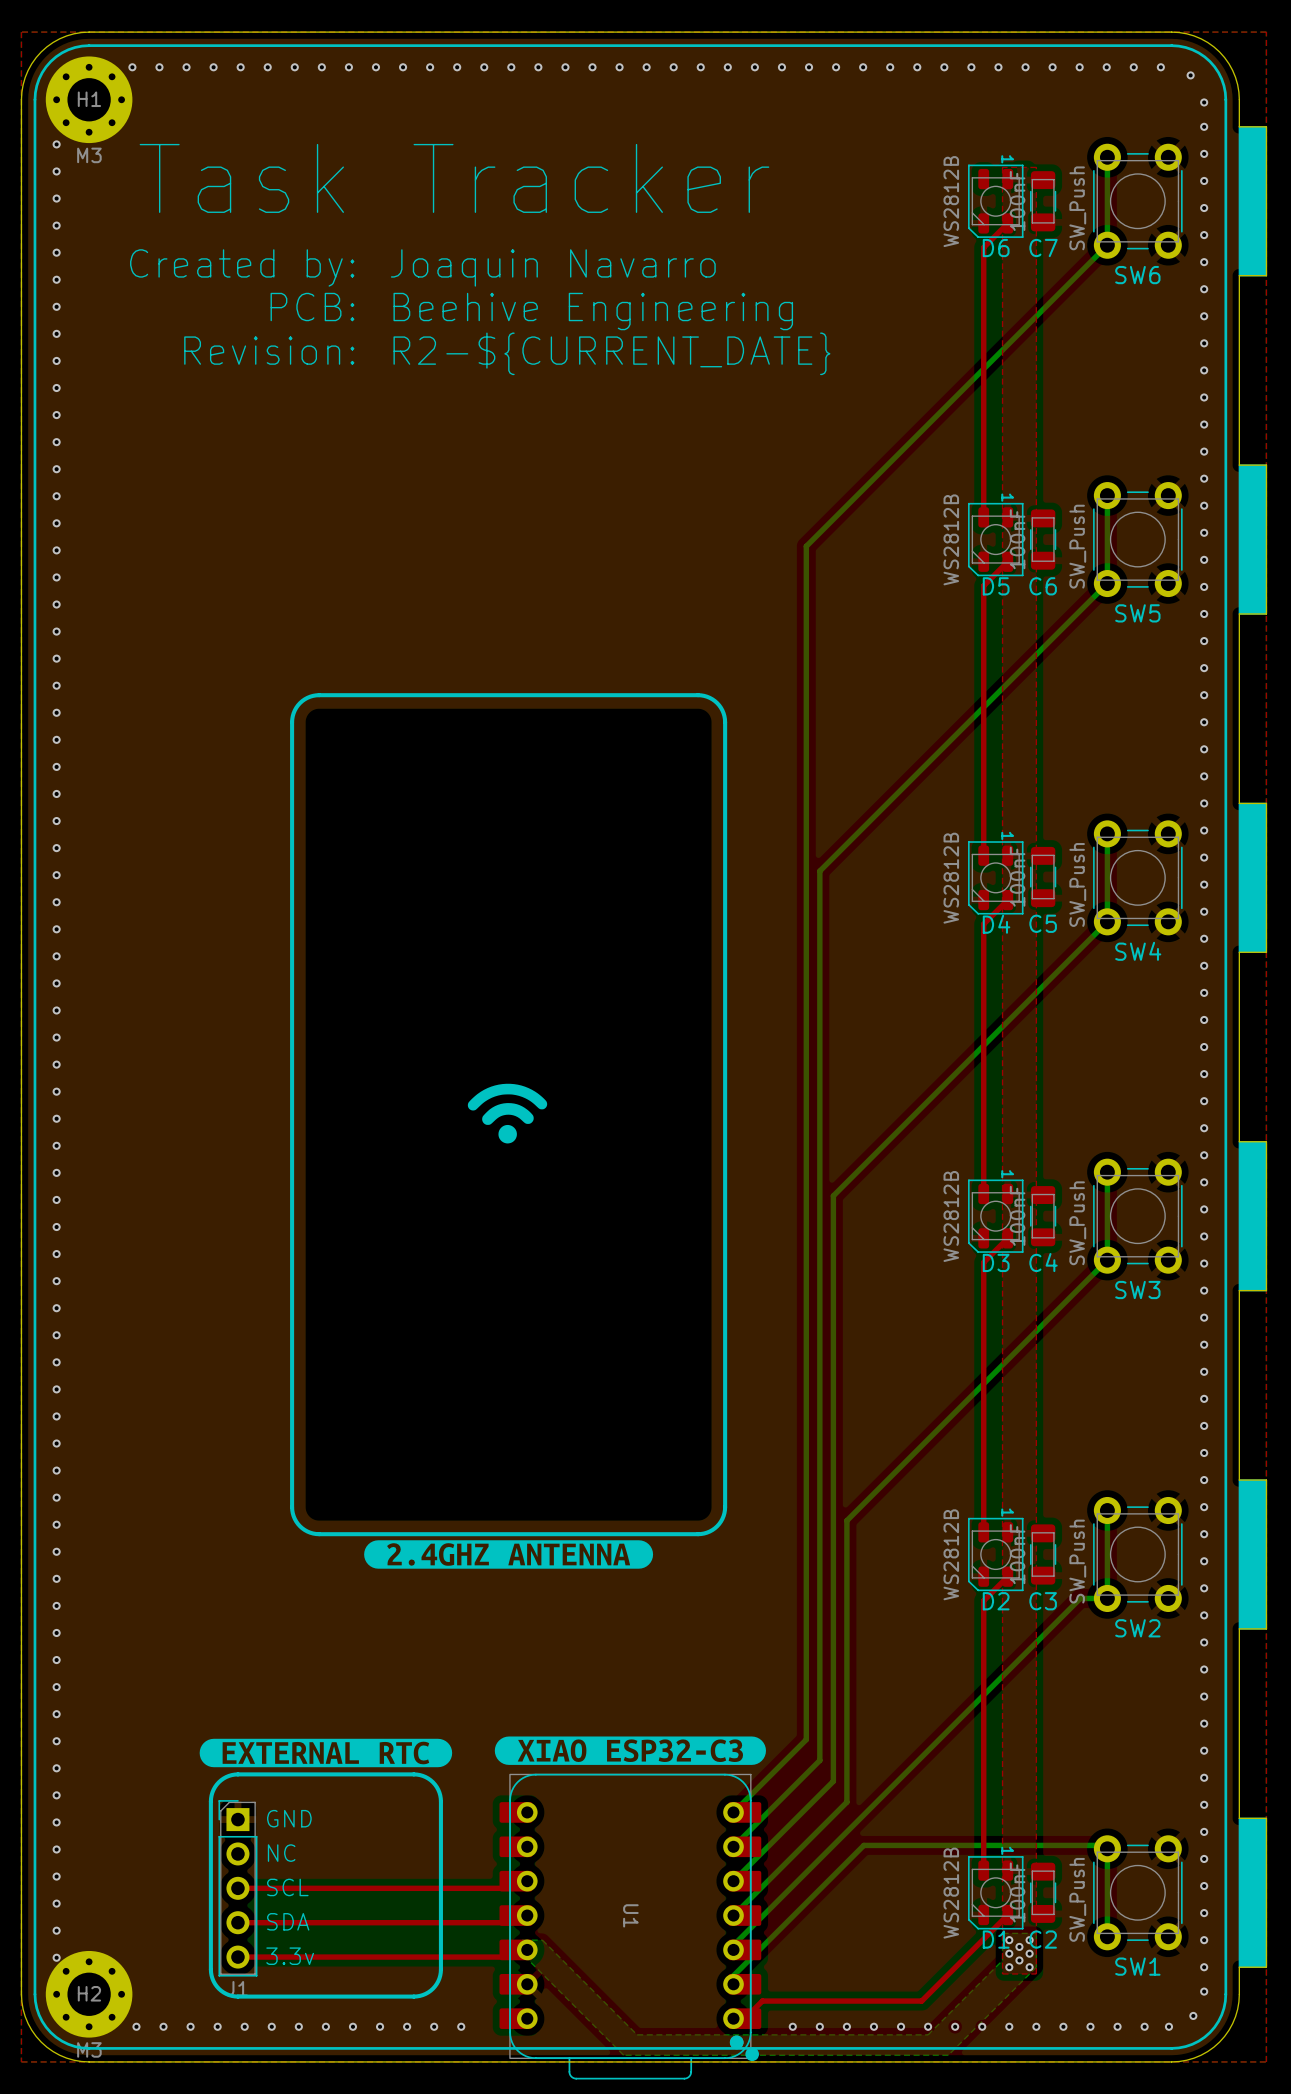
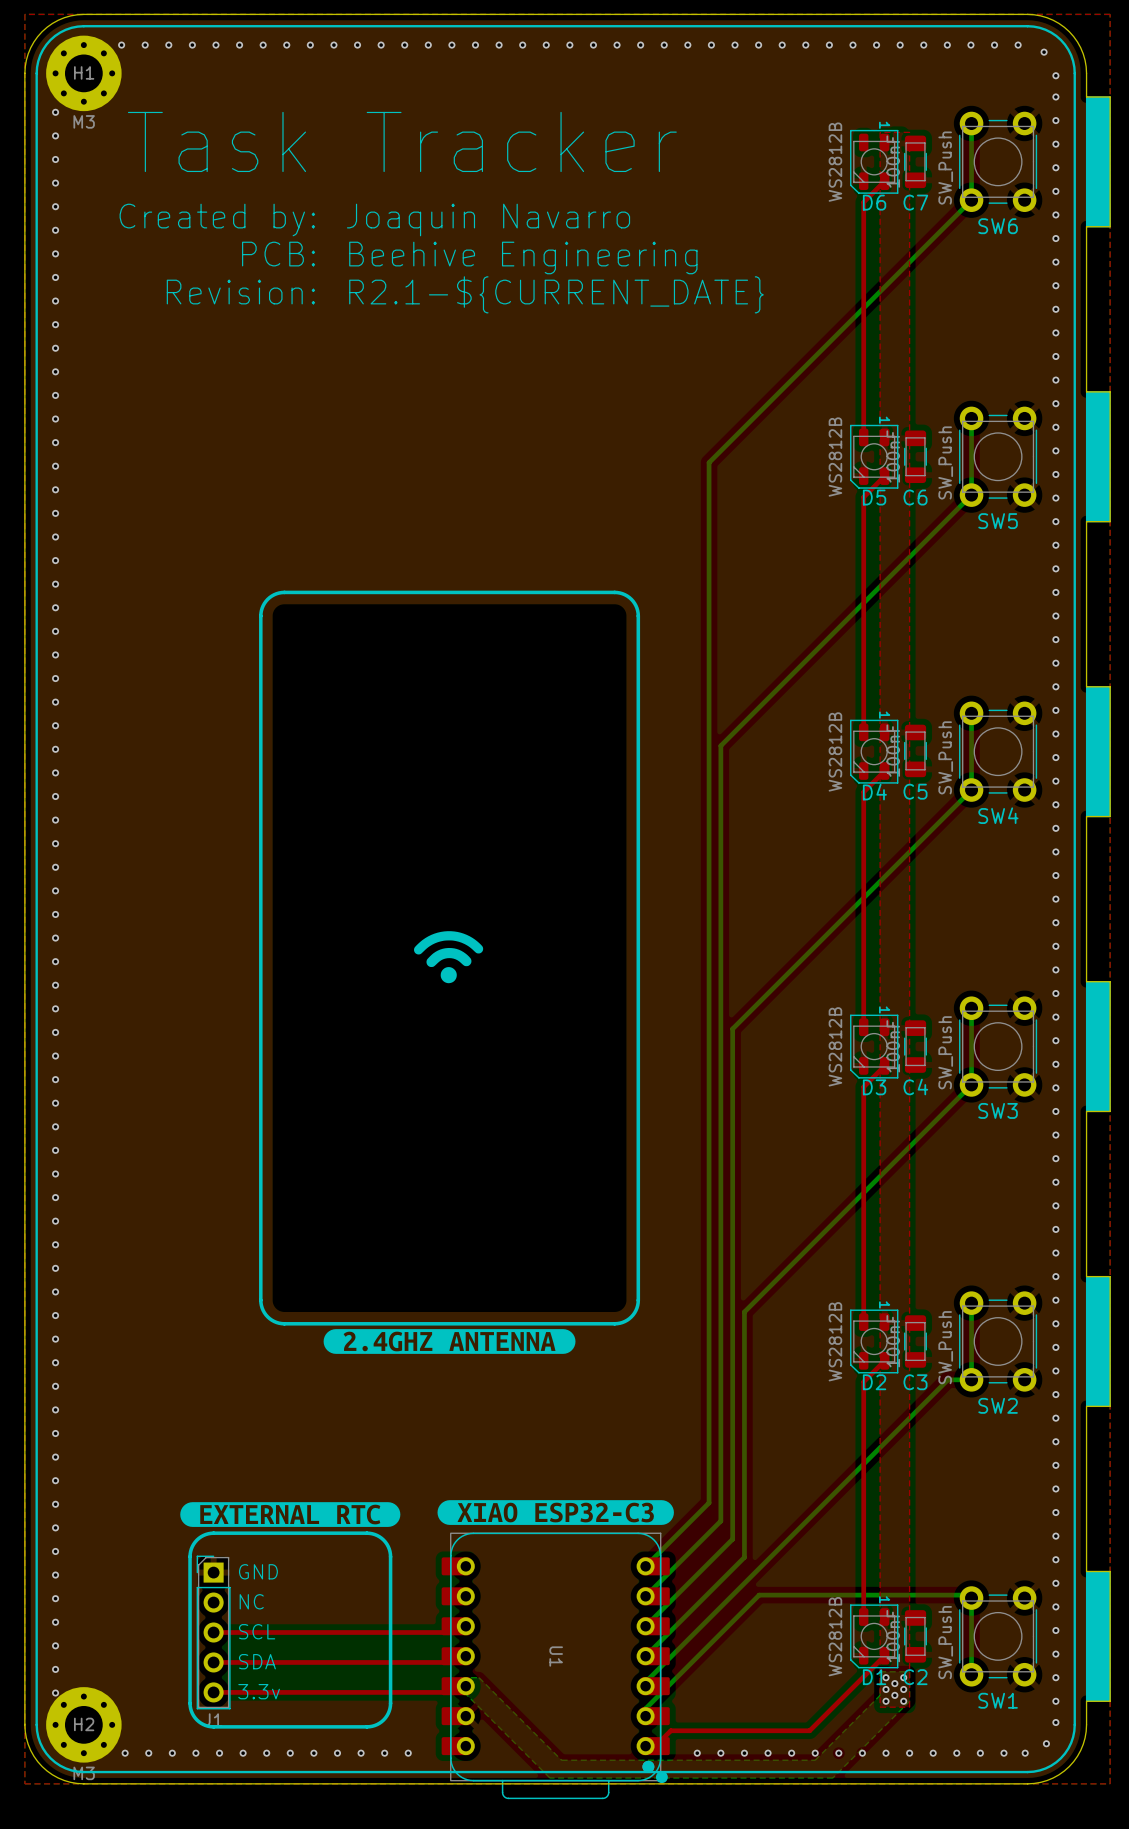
text: R2-${CURRENT_DATE} (611, 353) -> R2.1-${CURRENT_DATE} (556, 294)

